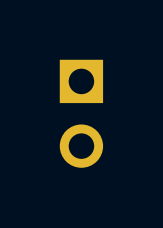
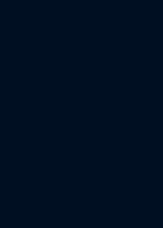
part: (81, 113) -> none

